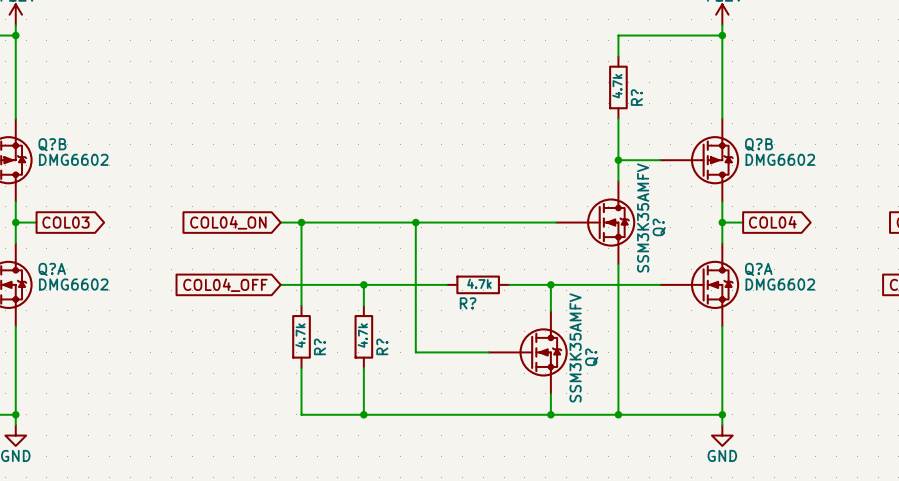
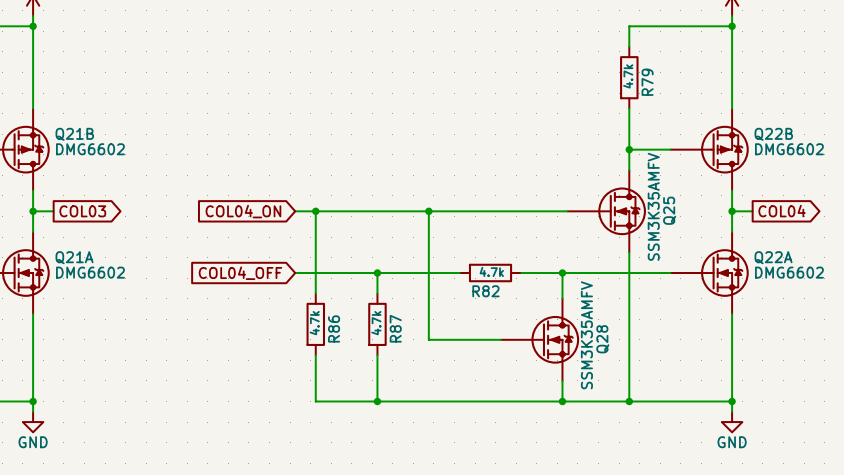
R? name: R? (636, 97) -> R79 (647, 82)
Q?B name: Q?B (52, 144) -> Q21B (74, 134)
Q?B name: Q?B (759, 144) -> Q22B (773, 134)
Q? name: Q? (659, 227) -> Q25 (669, 210)
Q?A name: Q?A (52, 269) -> Q21A (74, 257)
Q?A name: Q?A (758, 269) -> Q22A (773, 257)
R? name: R? (468, 303) -> R82 (485, 291)
R? name: R? (319, 346) -> R86 (334, 328)
R? name: R? (382, 346) -> R87 (395, 328)
Q? name: Q? (591, 357) -> Q28 (602, 339)

